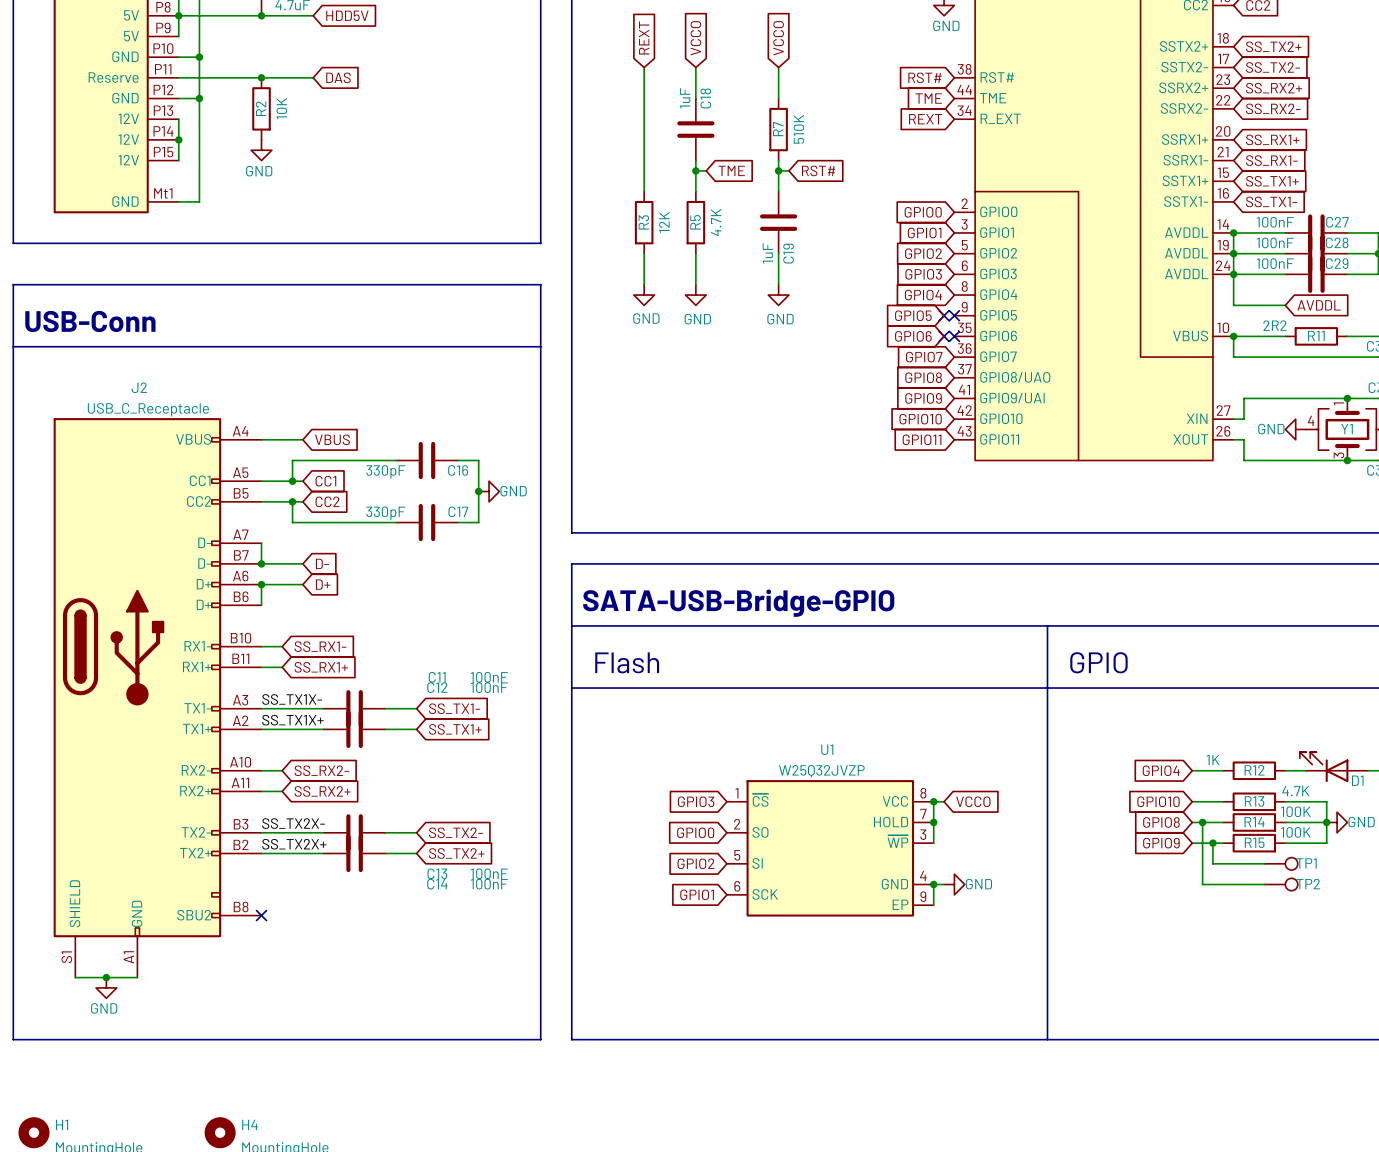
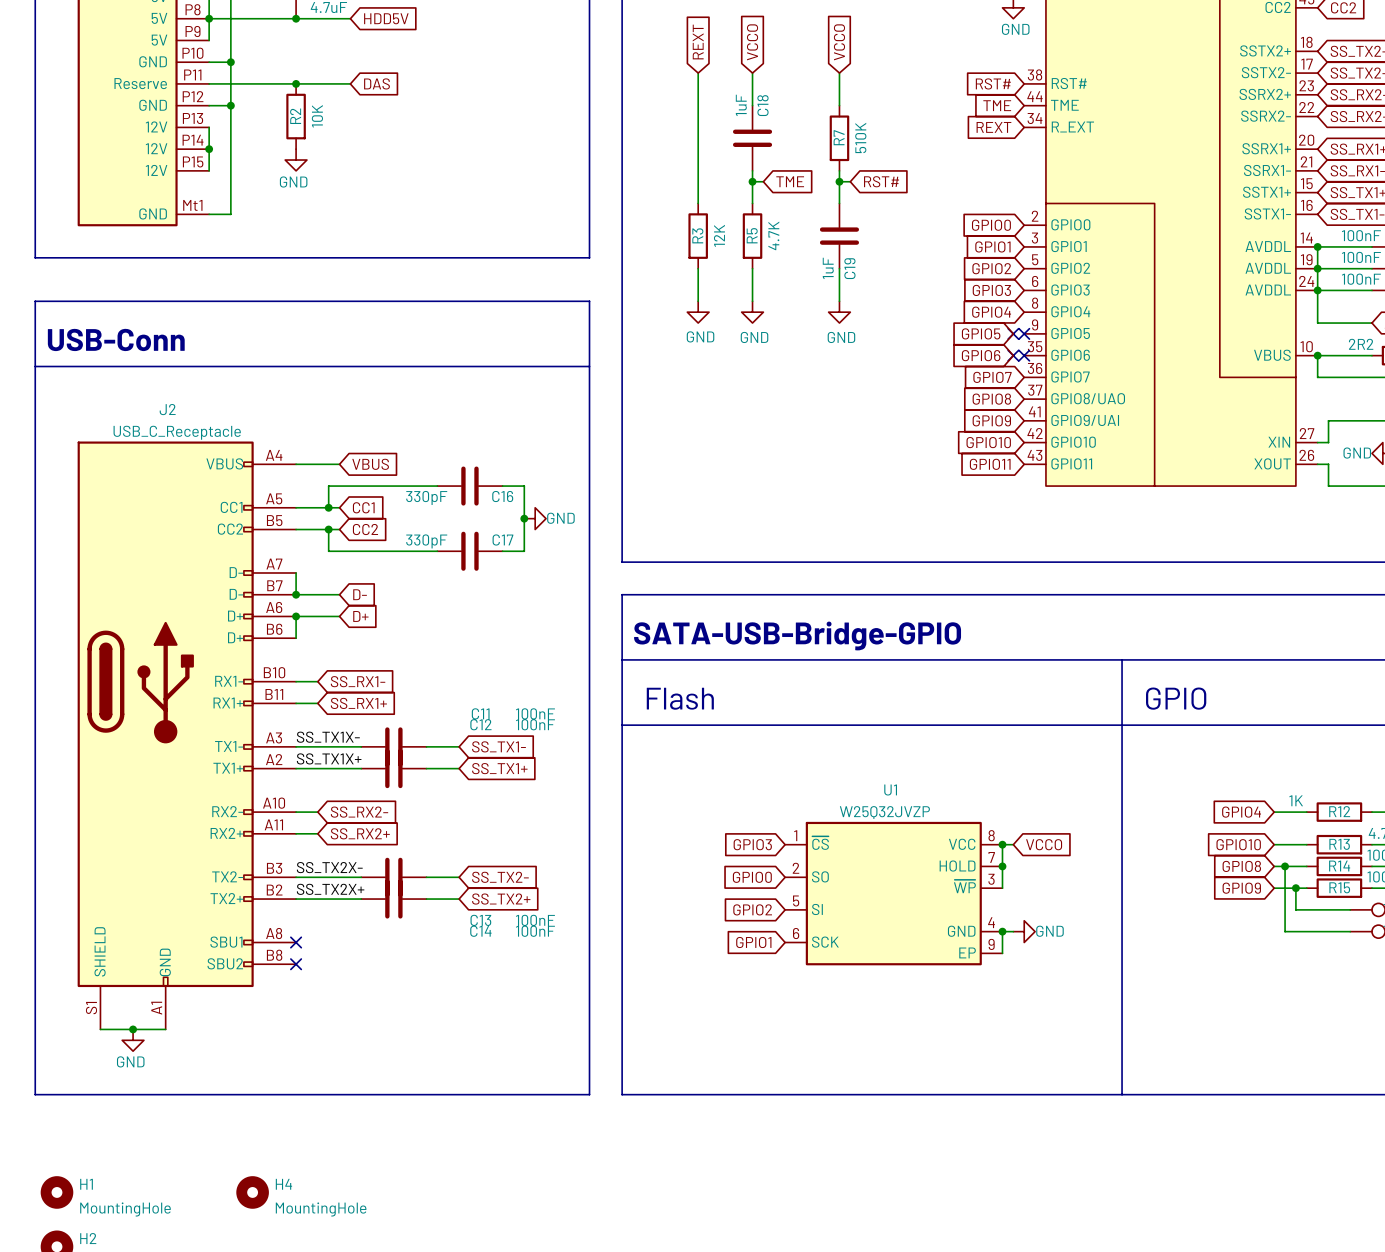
J2 symbol: [53, 418, 262, 978] -> [77, 441, 297, 1030]
no-connect mark: none -> (296, 942)

